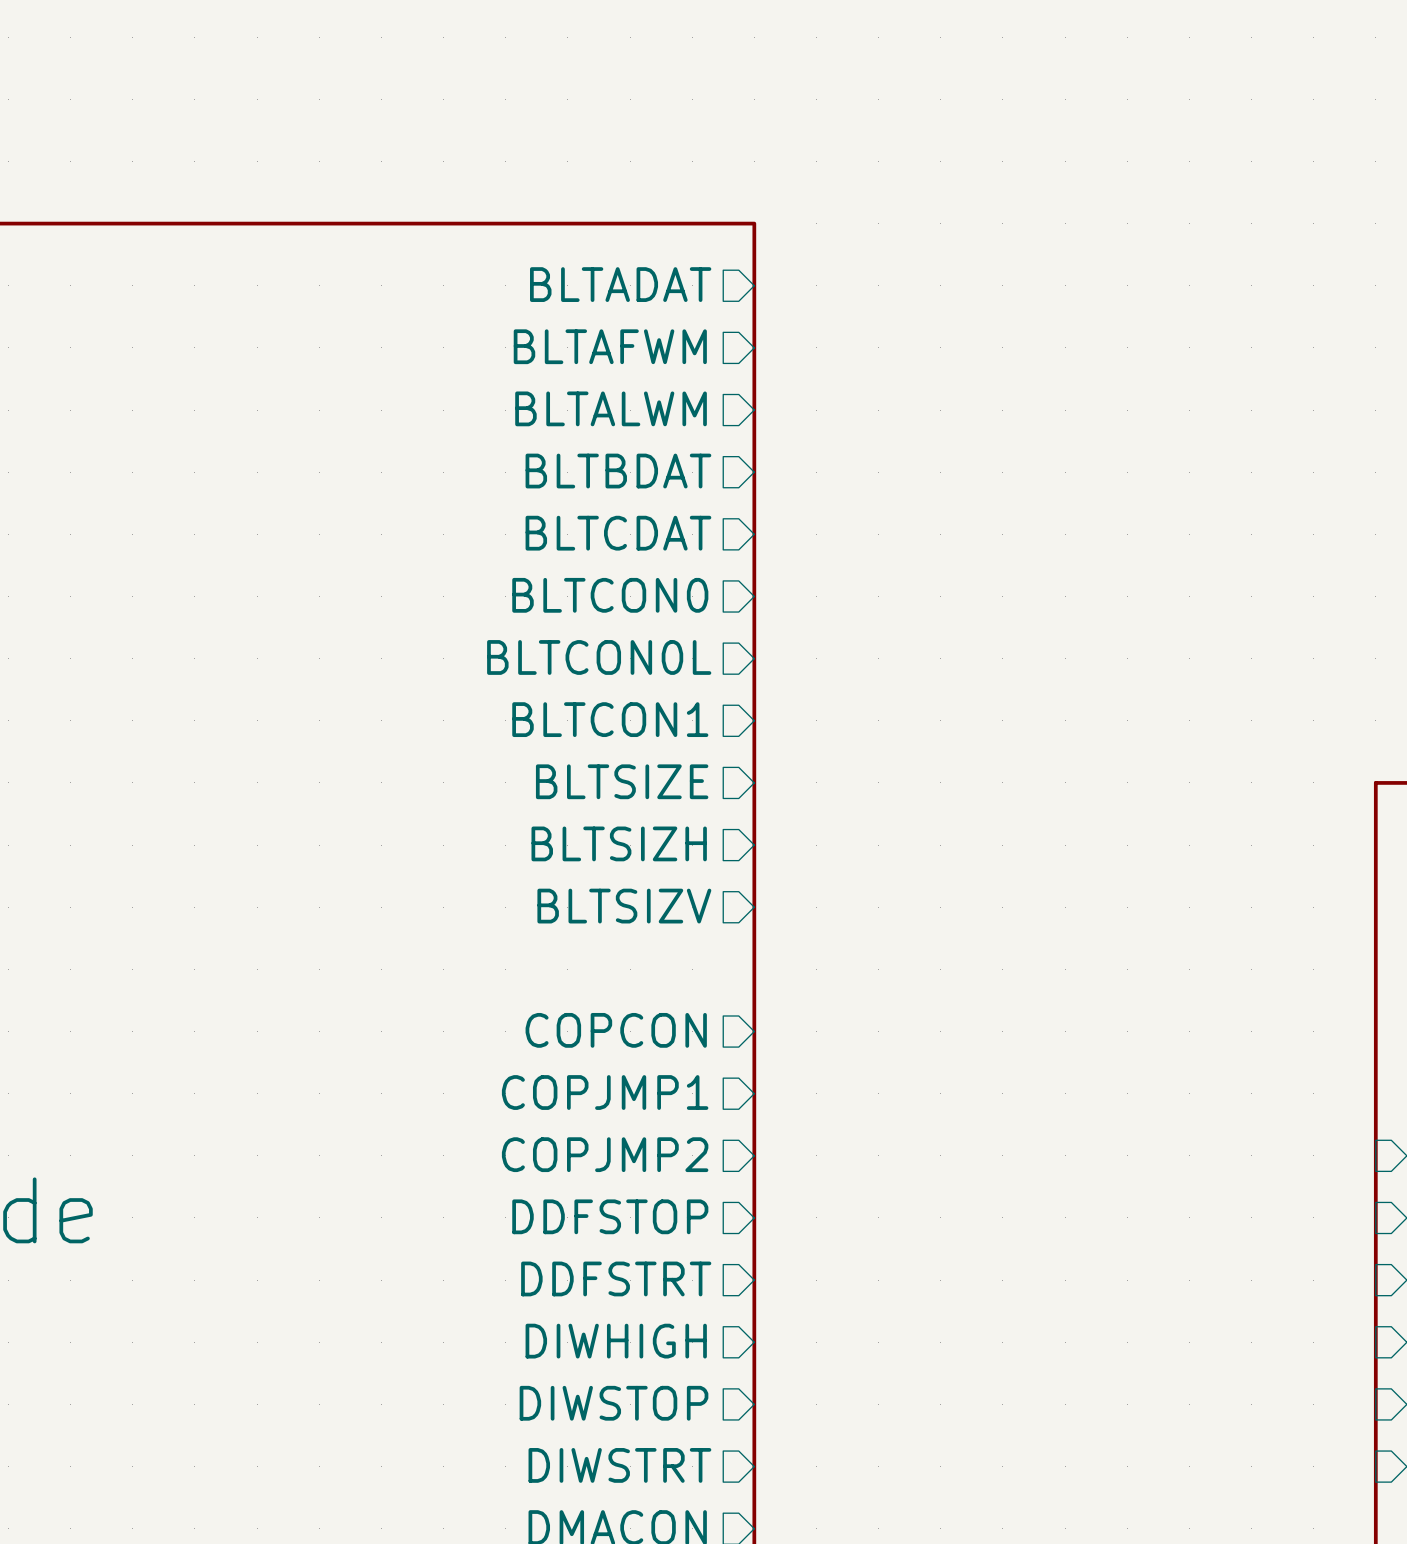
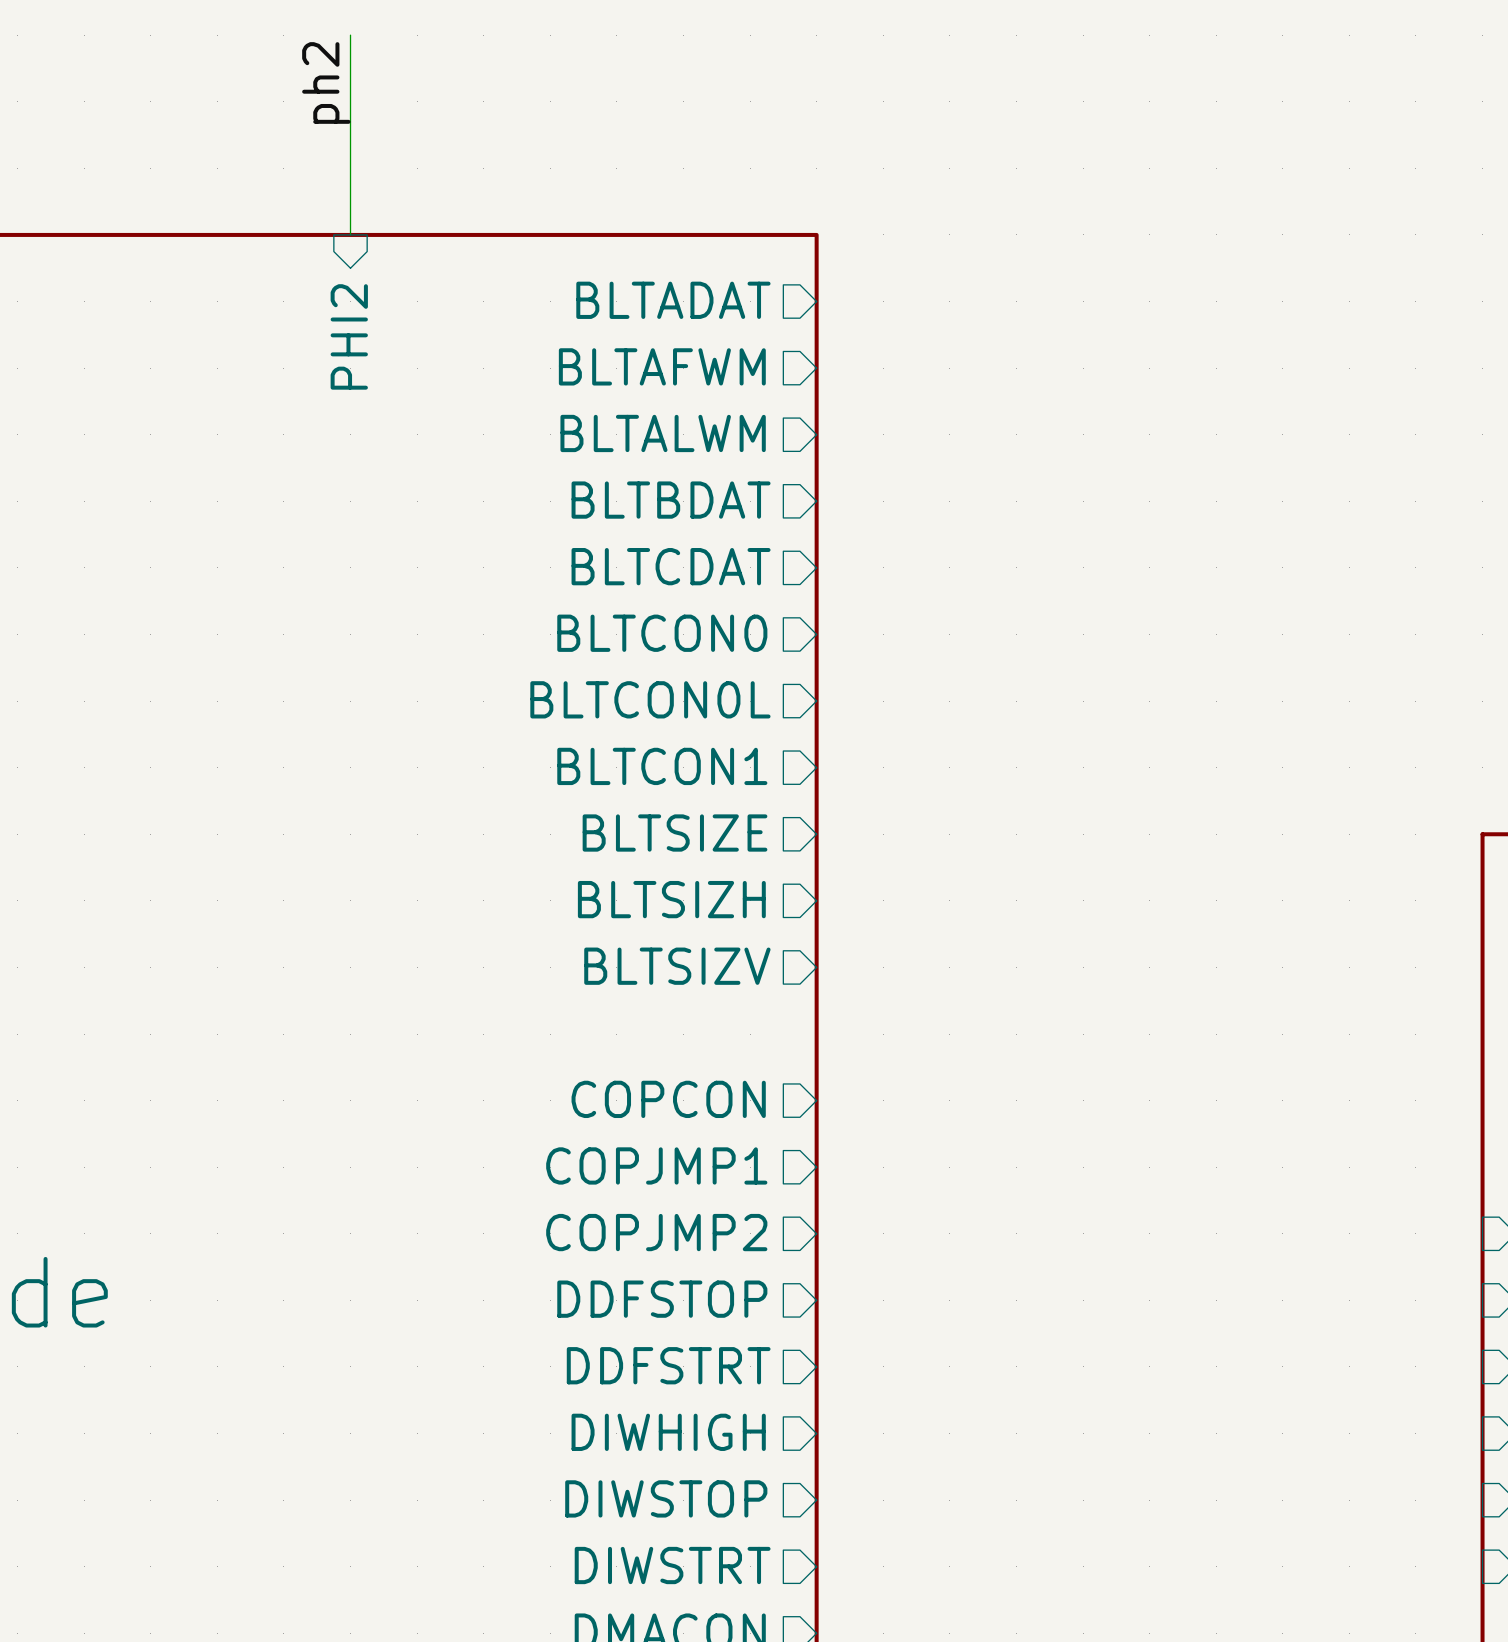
wire: none -> (350, 35) (350, 234)
label: none -> ph2 (326, 82)
sheet pin: none -> PHI2 (349, 336)

